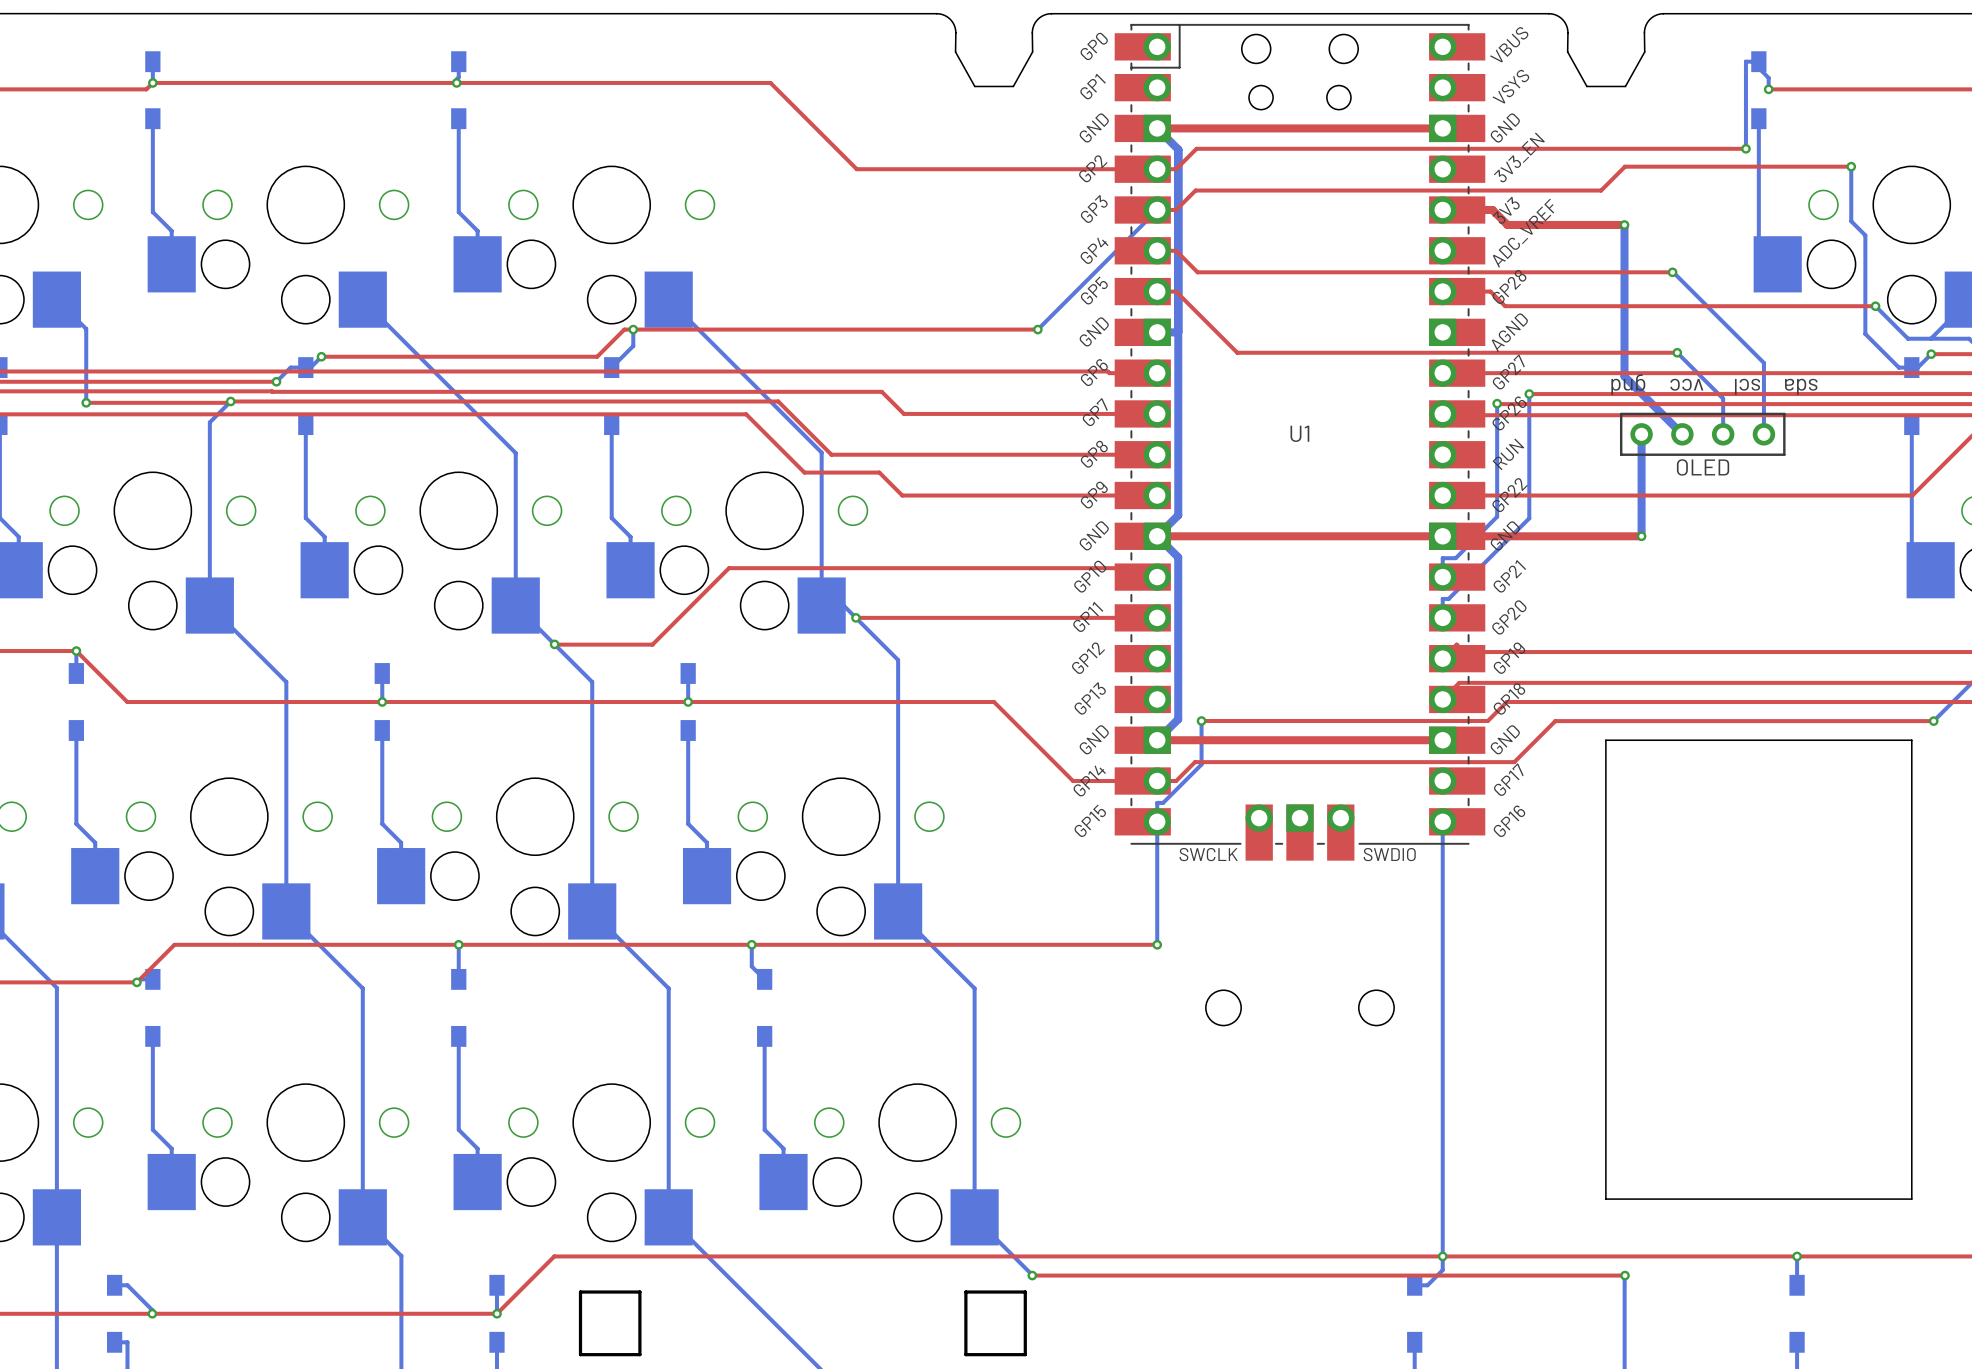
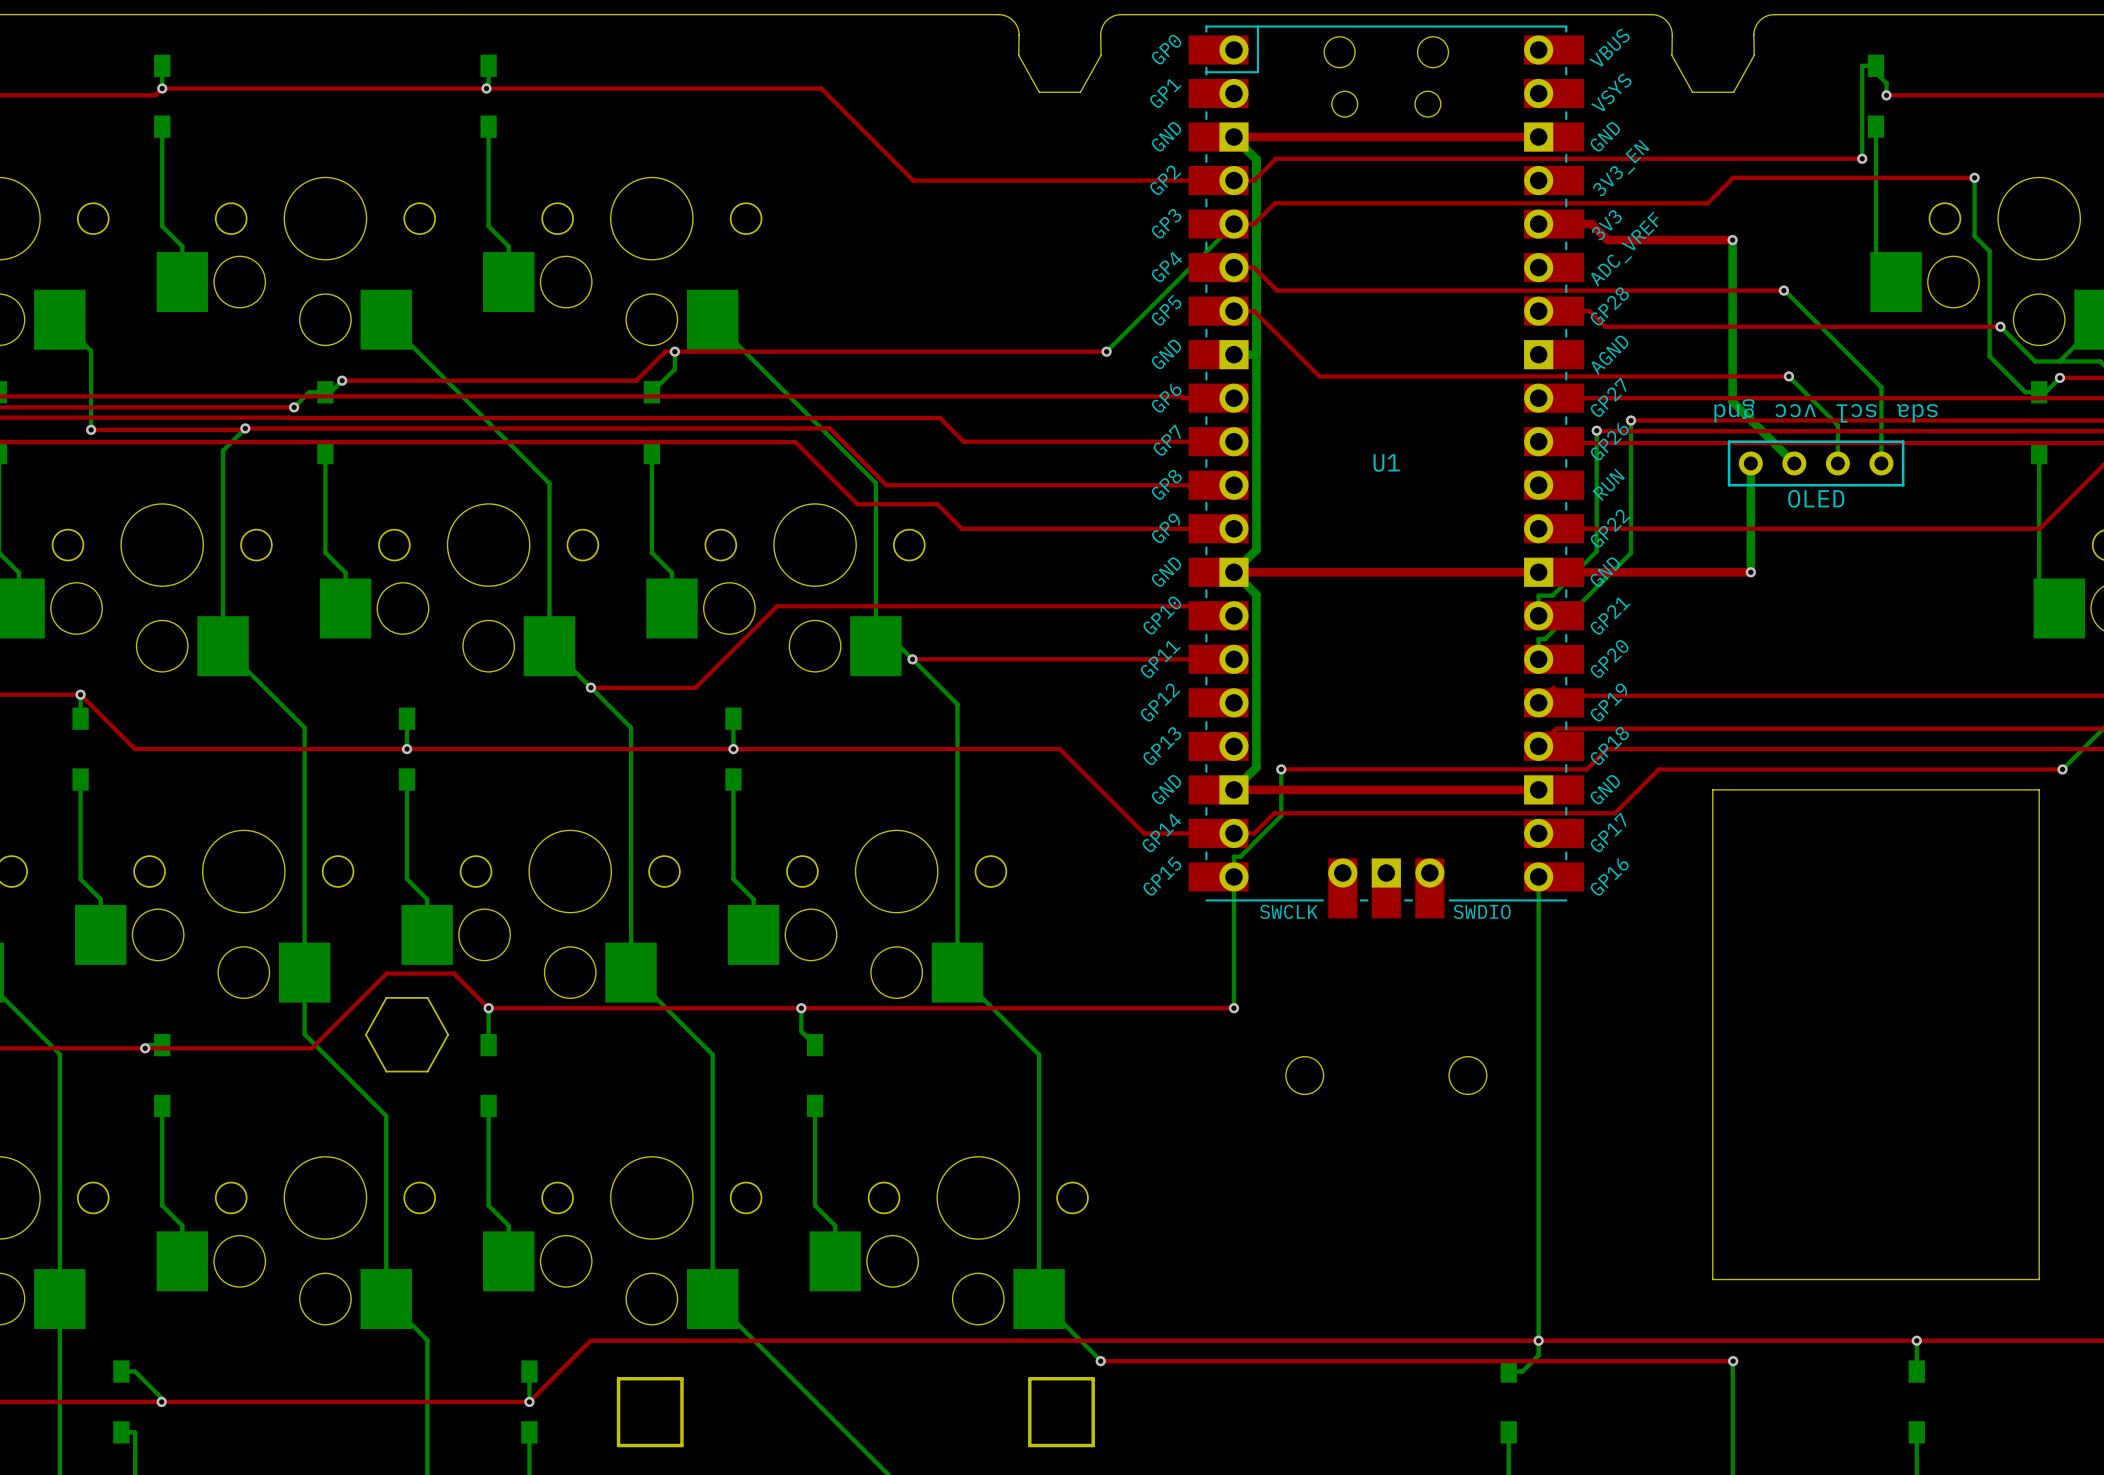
bottom track: (286, 911) (362, 988) (362, 1045) -> (304, 973) (304, 1034) (386, 1115)
drawing: none -> [365, 997, 450, 1073]
top track: (458, 944) (174, 944) (136, 982) -> (488, 1008) (453, 973) (386, 973) (311, 1048) (145, 1048)

